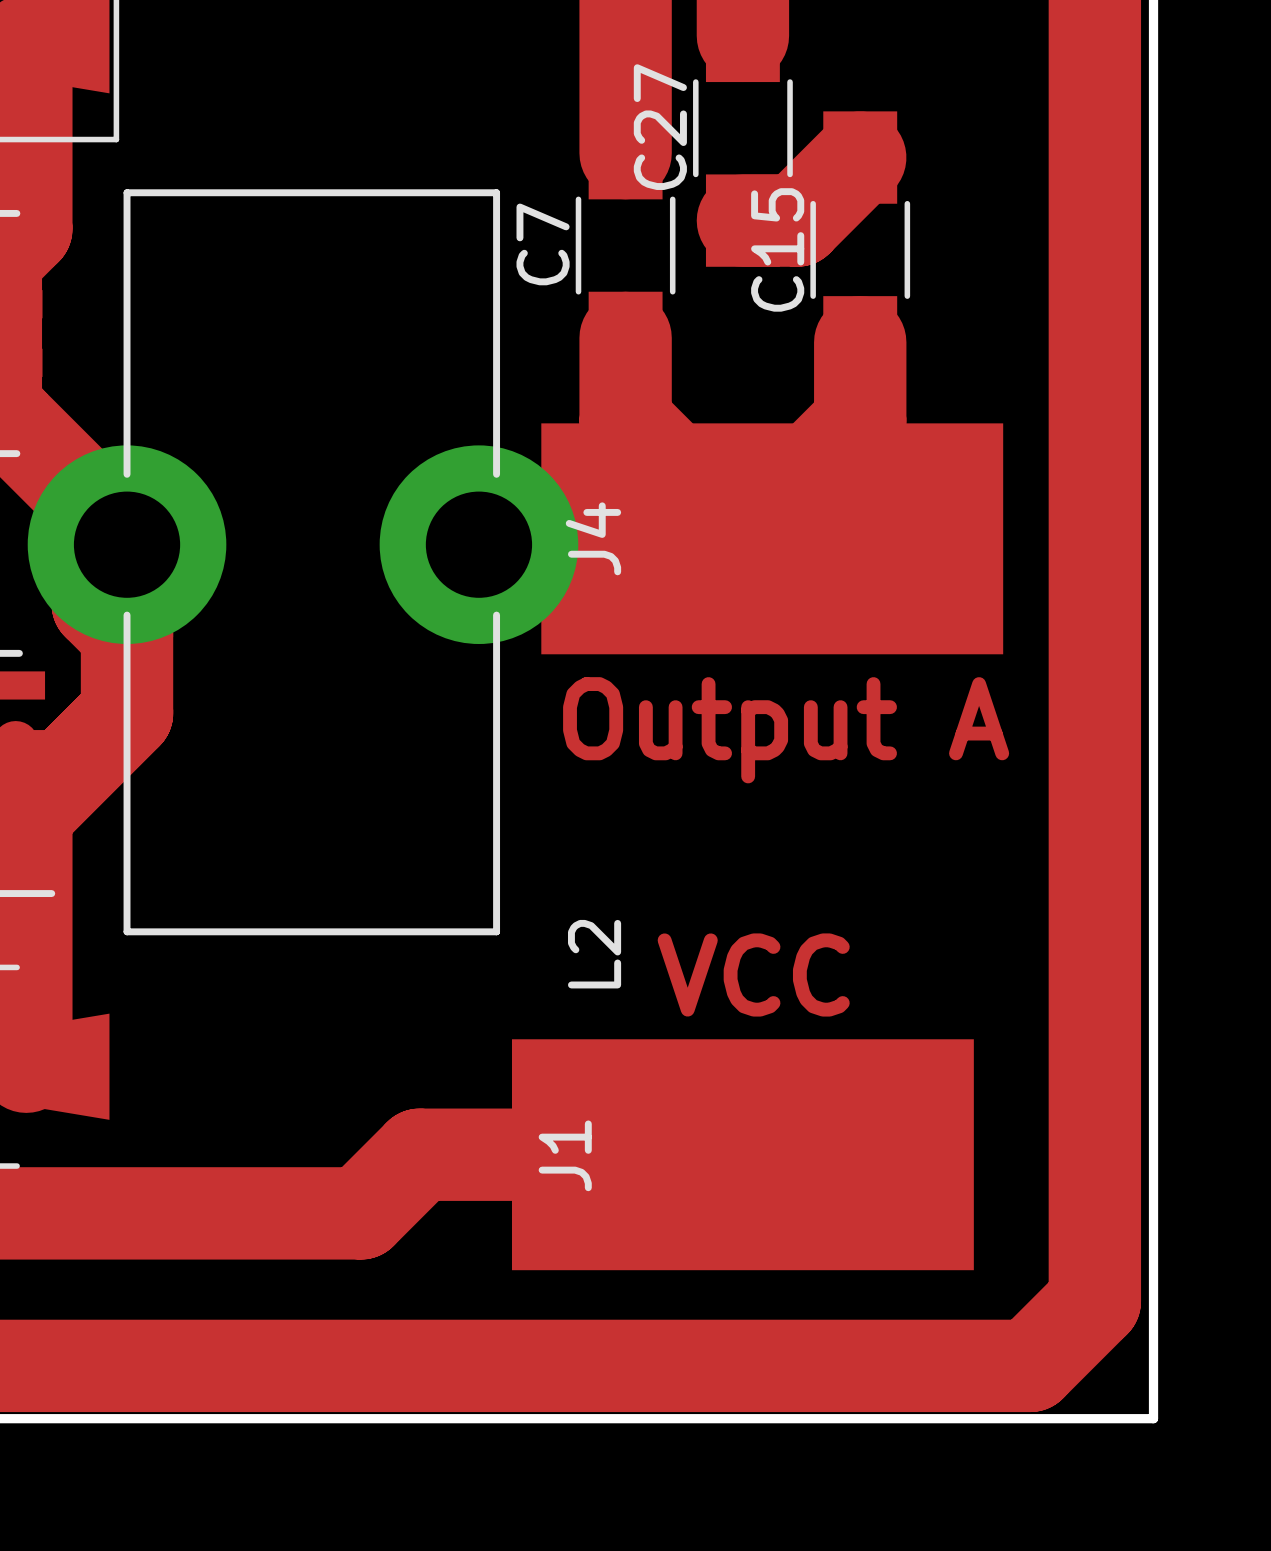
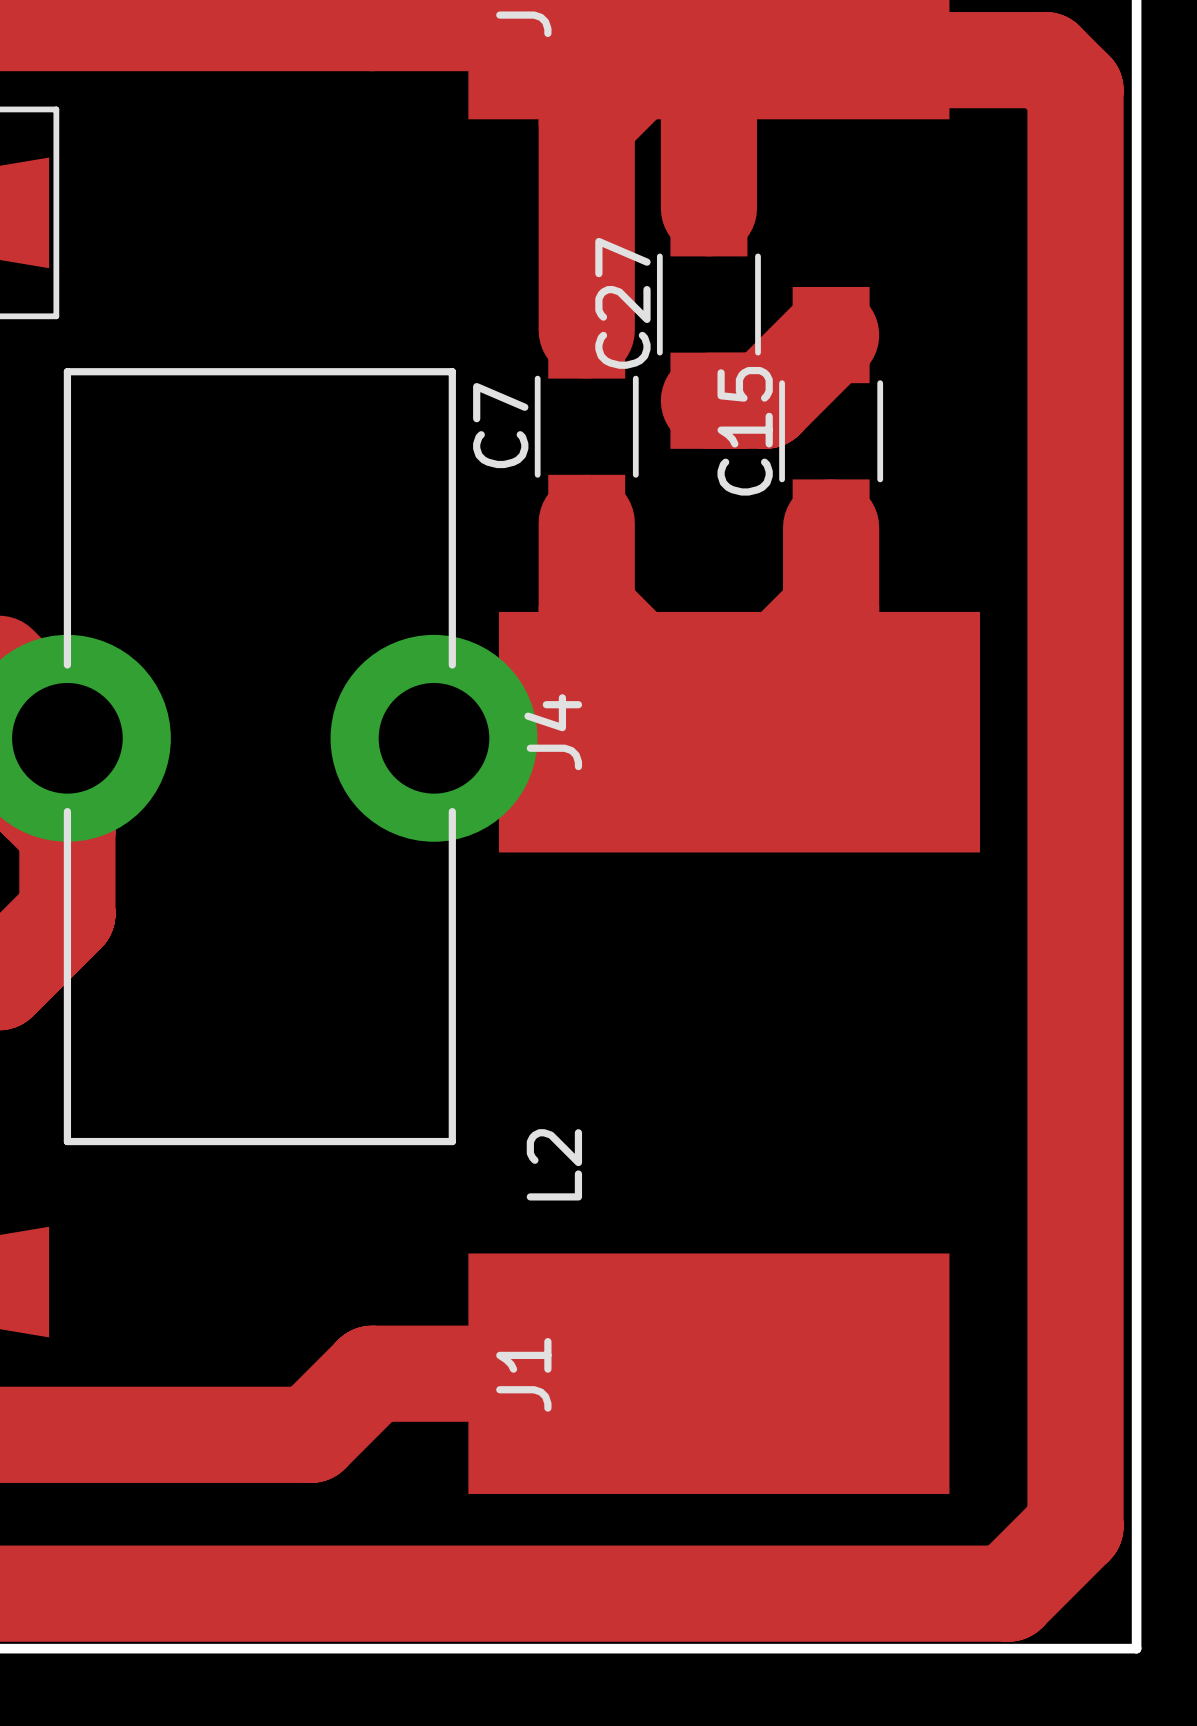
text: Output A (786, 730) -> none
text: VCC (753, 974) -> none

